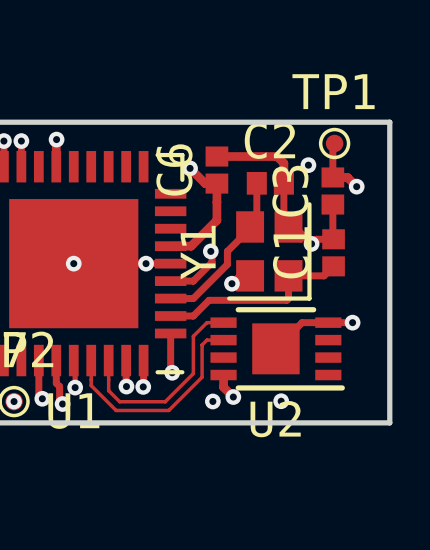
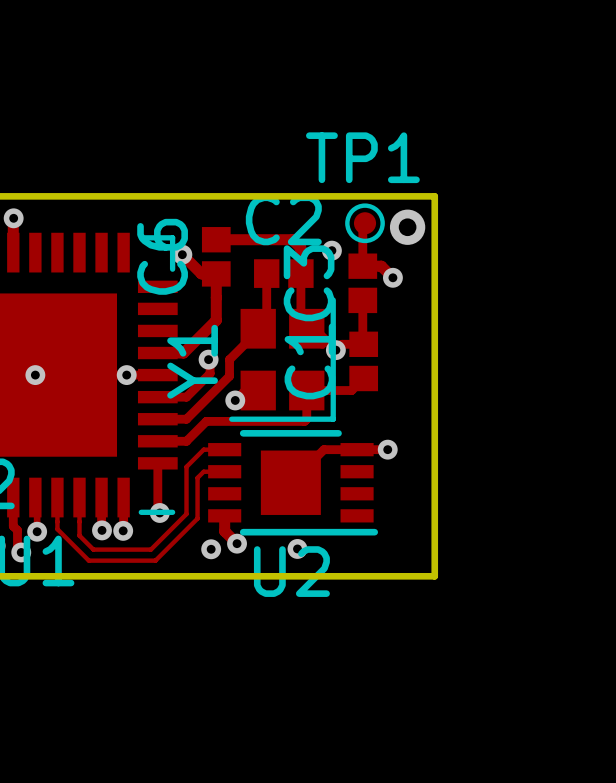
via: none -> (407, 227)

